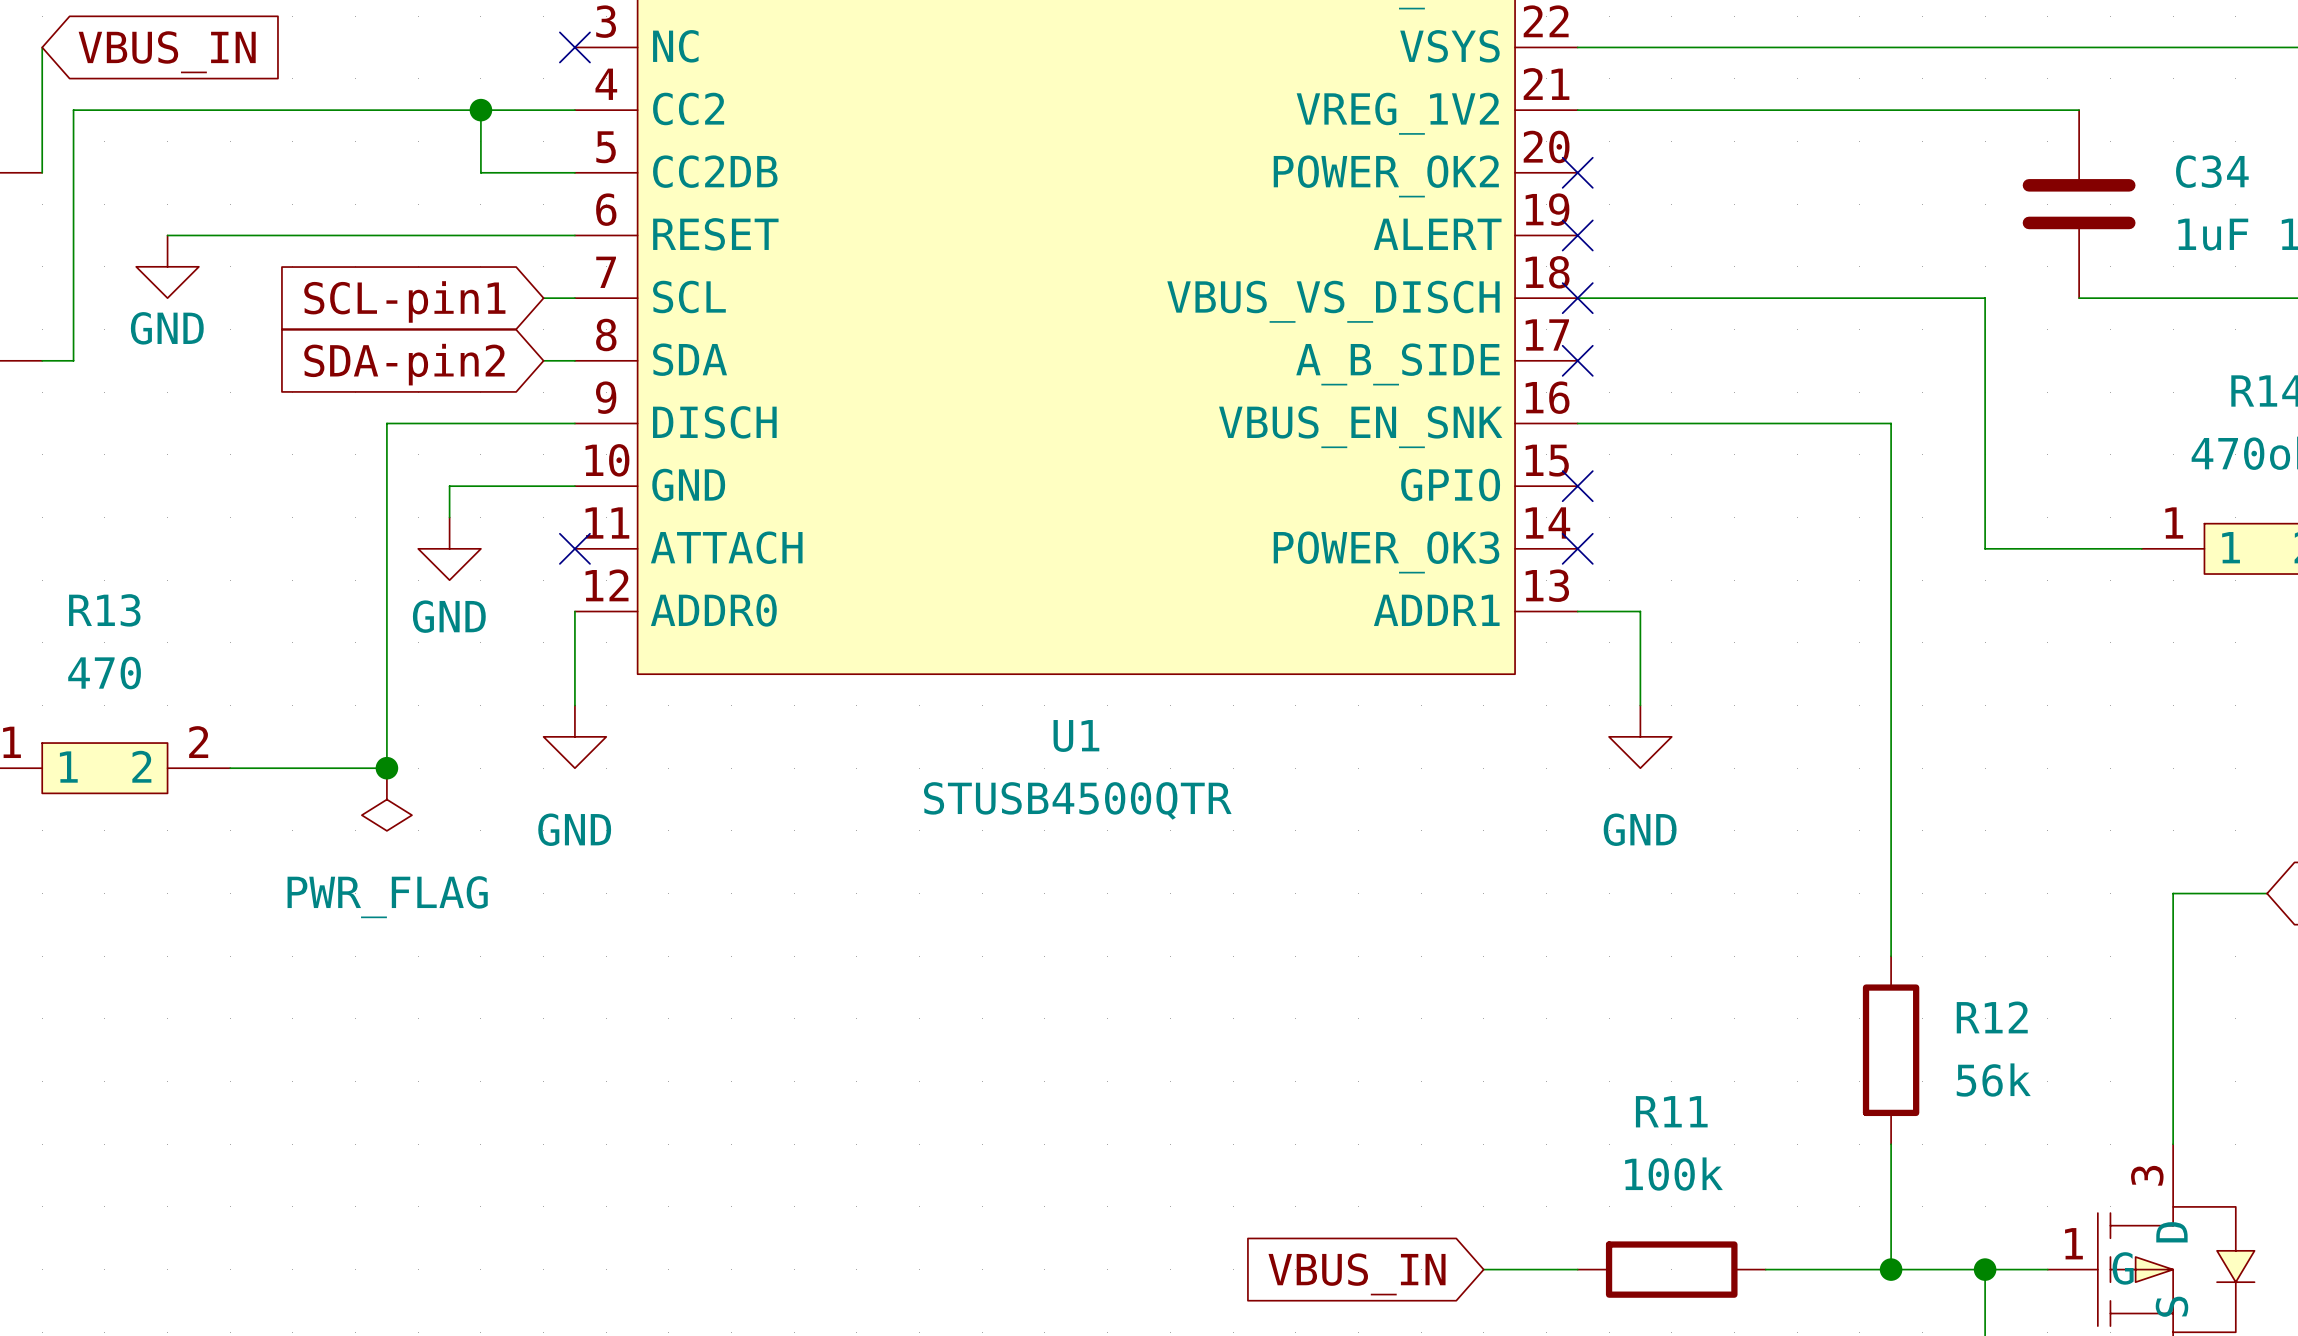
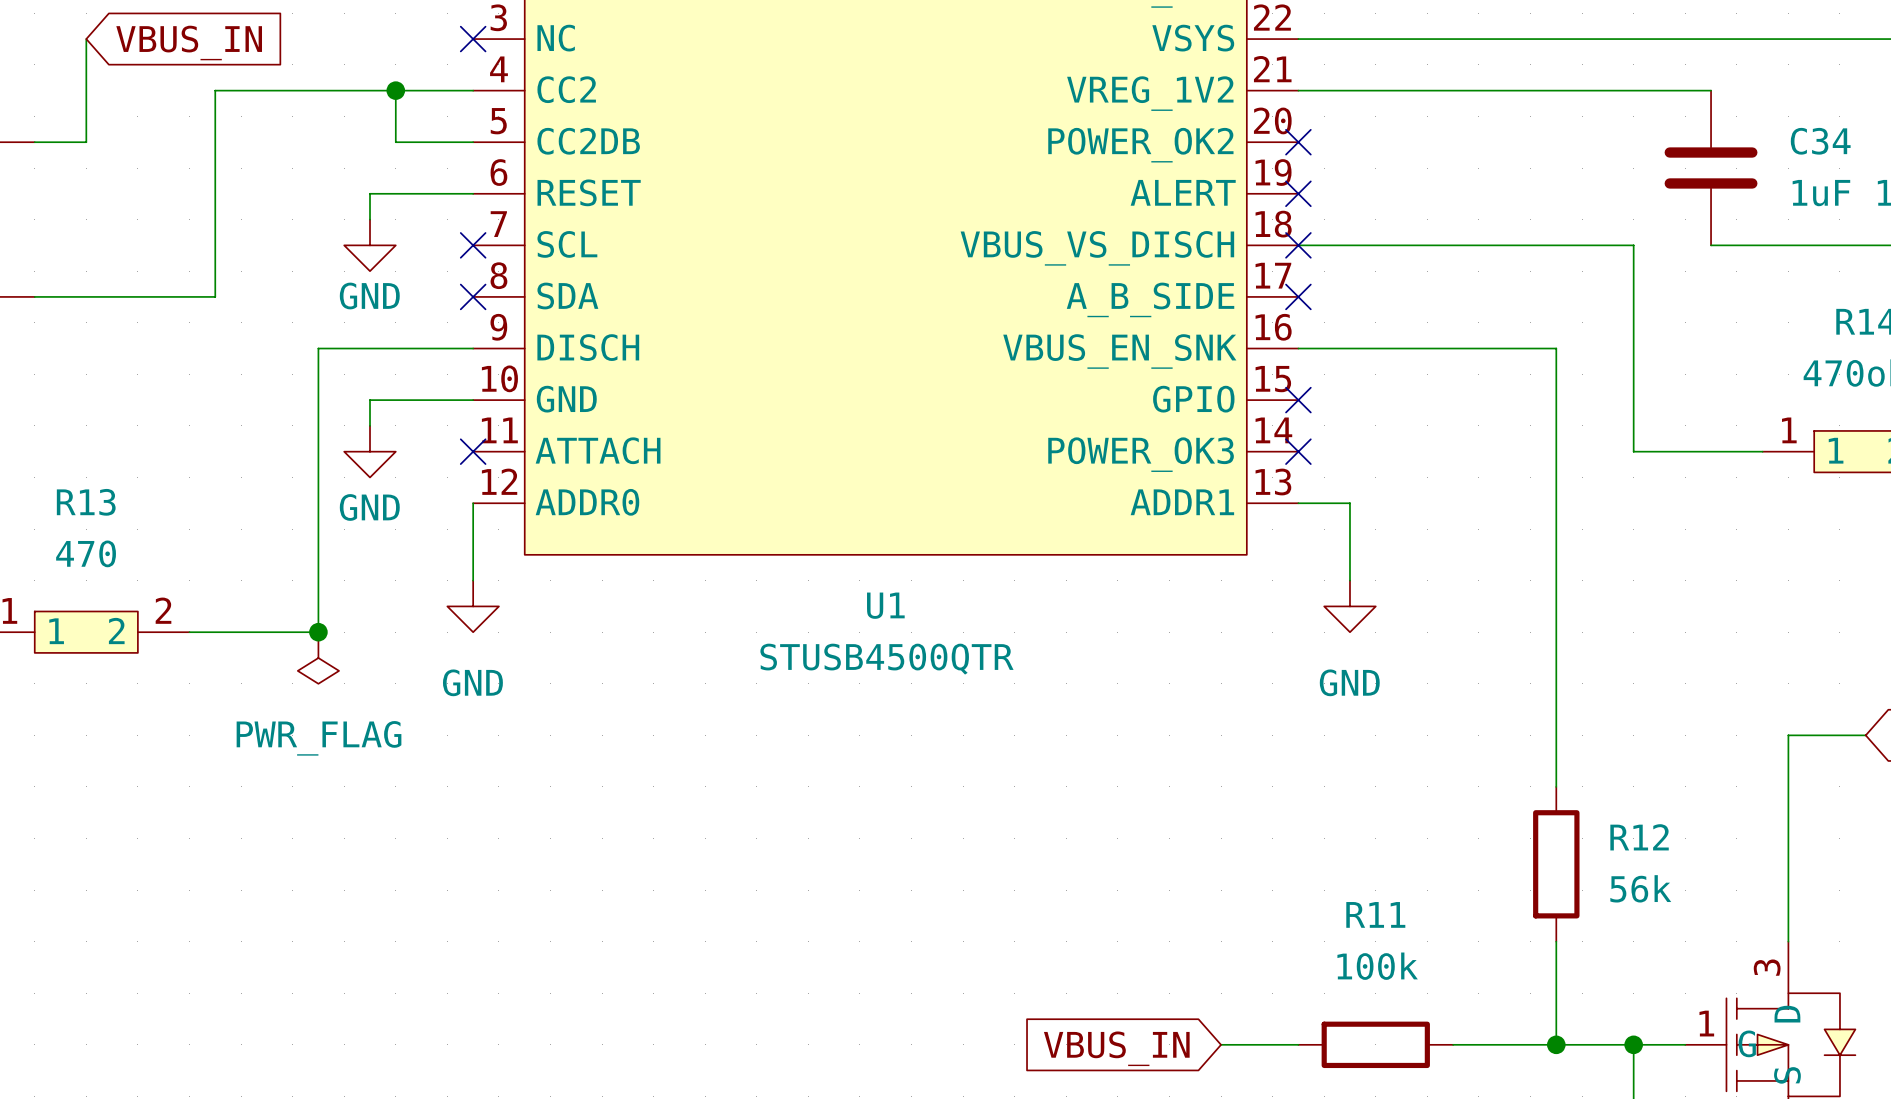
wire: (42, 47) (42, 172) -> (86, 39) (86, 142) (34, 142)
global label position: VBUS_IN (167, 52) -> VBUS_IN (189, 42)
wire: (261, 110) (73, 110) (73, 360) -> (215, 90) (215, 296) (60, 296)
wire: (167, 235) (449, 235) -> (370, 219) (370, 193)
power symbol position: GND (167, 266) -> GND (370, 245)
wire: (543, 298) (574, 298) -> none
no-connect mark: none -> (473, 245)
global label: SCL-pin1 (404, 301) -> none
wire: (543, 360) (574, 360) -> none
no-connect mark: none -> (473, 296)
global label: SDA-pin2 (404, 364) -> none

